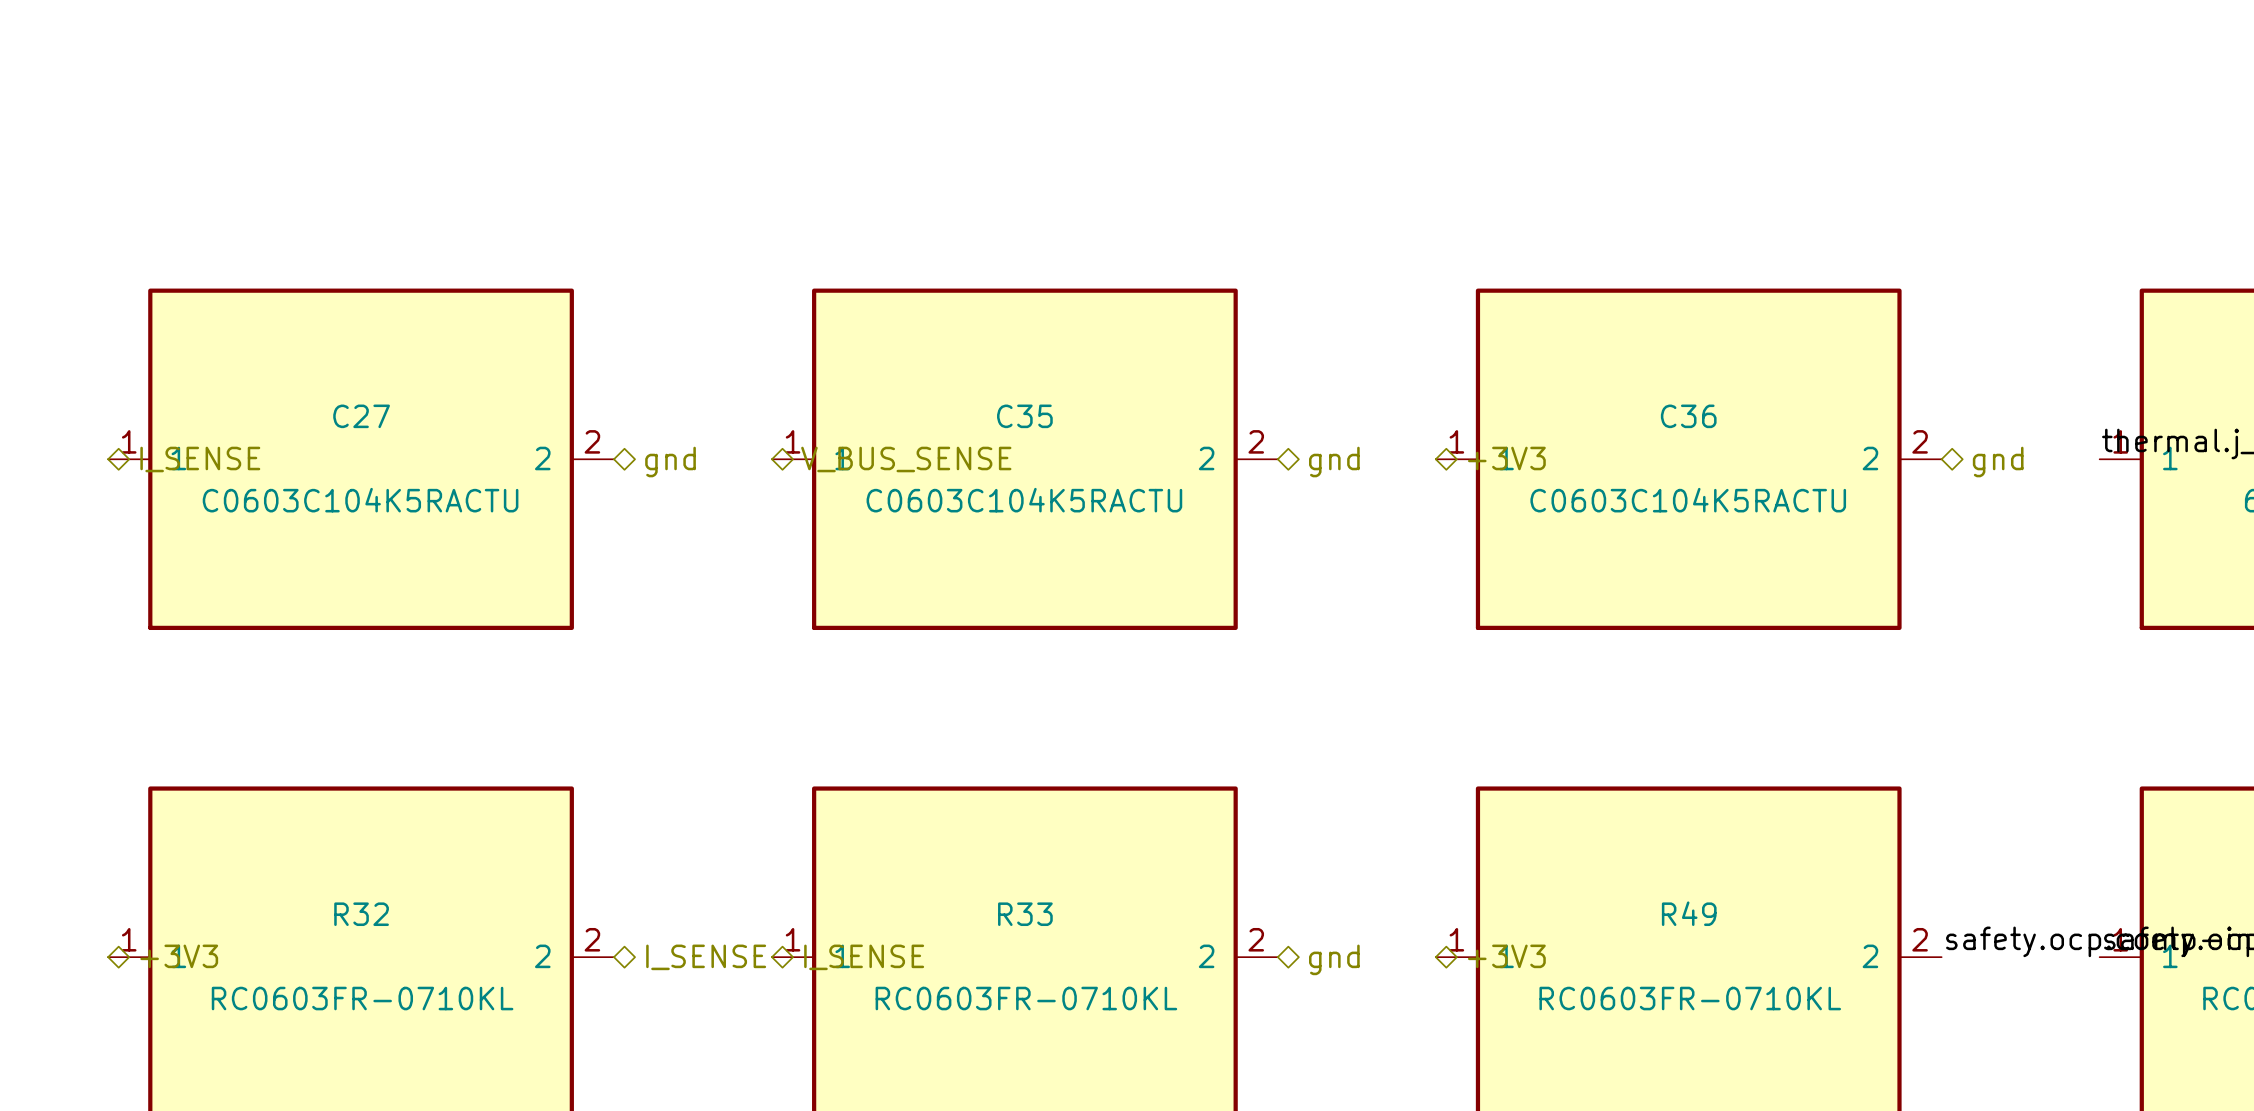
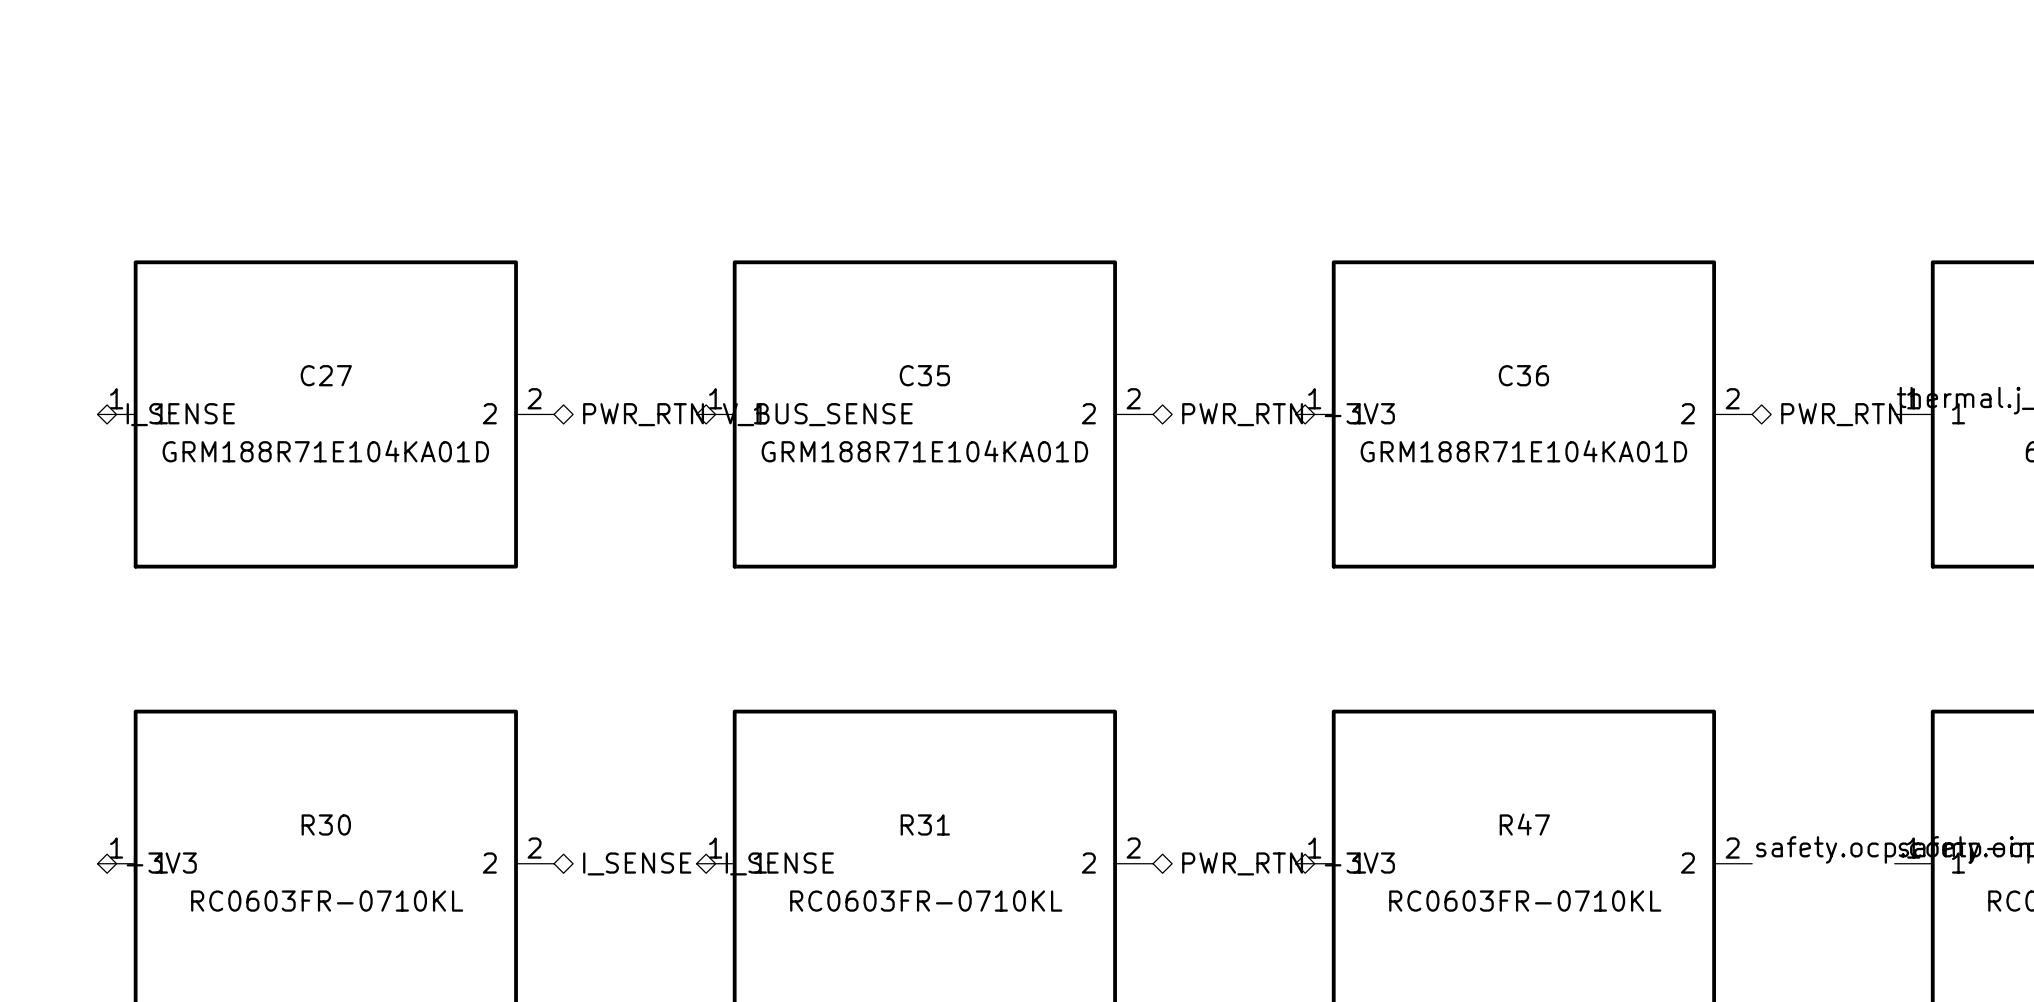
hierarchical label: gnd (670, 462) -> PWR_RTN (643, 414)
hierarchical label: gnd (1334, 462) -> PWR_RTN (1242, 414)
hierarchical label: gnd (1998, 462) -> PWR_RTN (1841, 414)
C27 value: C0603C104K5RACTU (360, 500) -> GRM188R71E104KA01D (325, 451)
C35 value: C0603C104K5RACTU (1024, 500) -> GRM188R71E104KA01D (924, 451)
C36 value: C0603C104K5RACTU (1688, 500) -> GRM188R71E104KA01D (1523, 451)
R49 name: R49 (1689, 913) -> R47 (1524, 824)
R32 name: R32 (361, 914) -> R30 (326, 824)
R33 name: R33 (1025, 914) -> R31 (925, 824)
hierarchical label: gnd (1334, 959) -> PWR_RTN (1242, 863)

